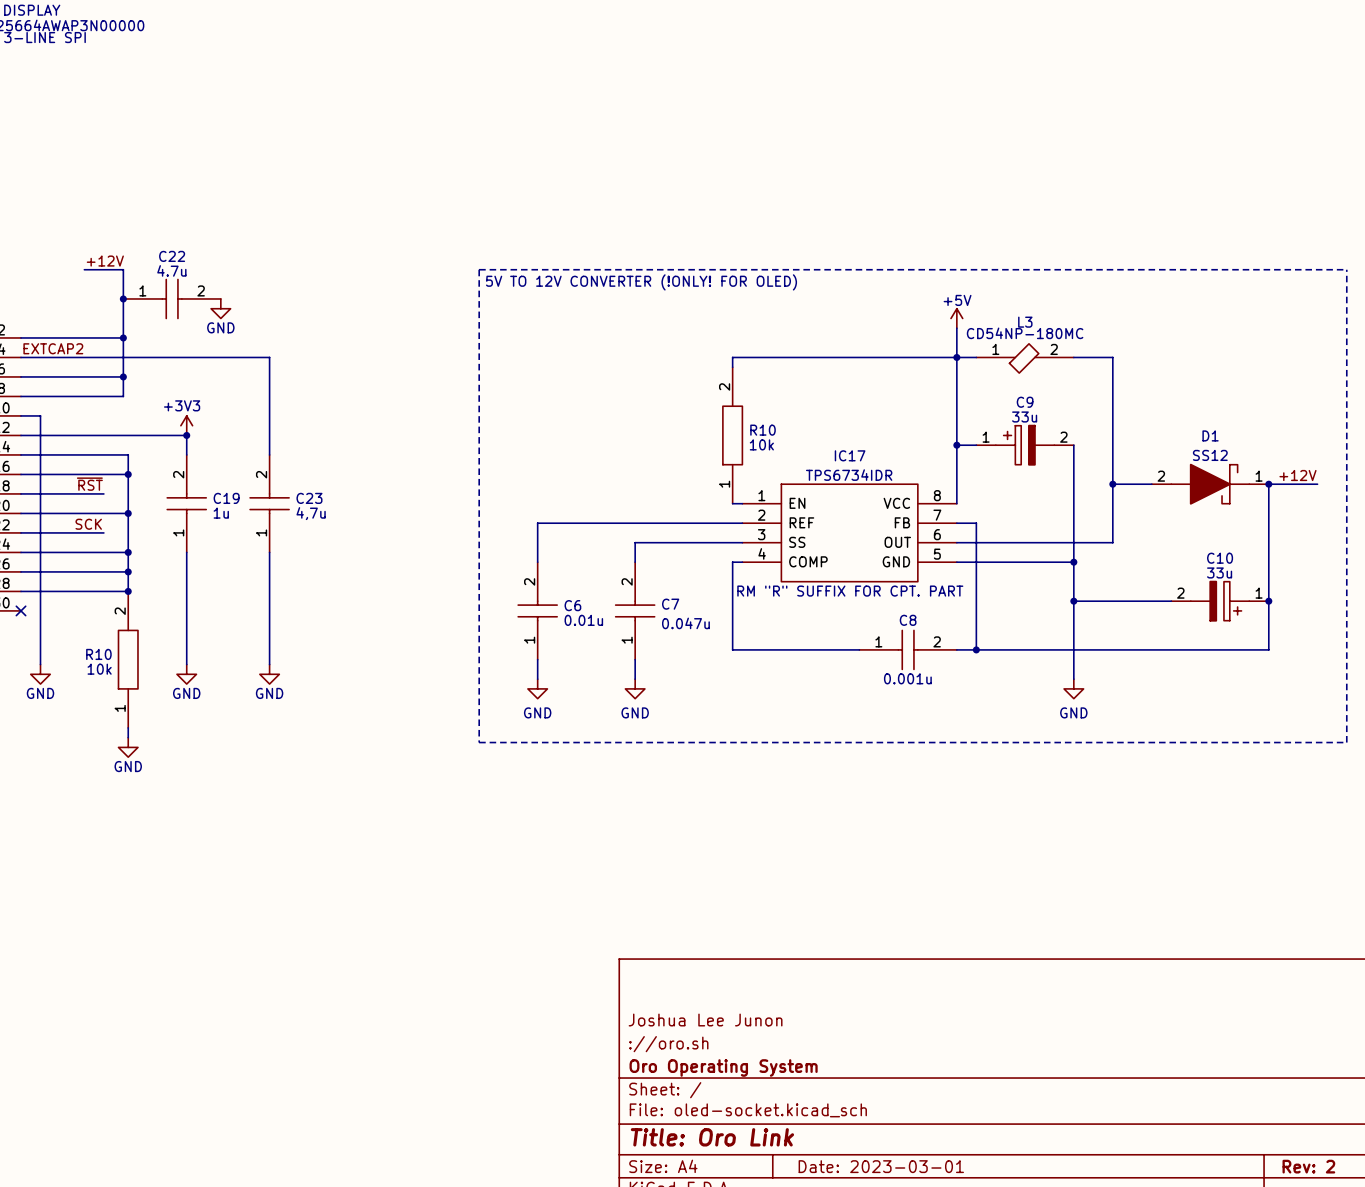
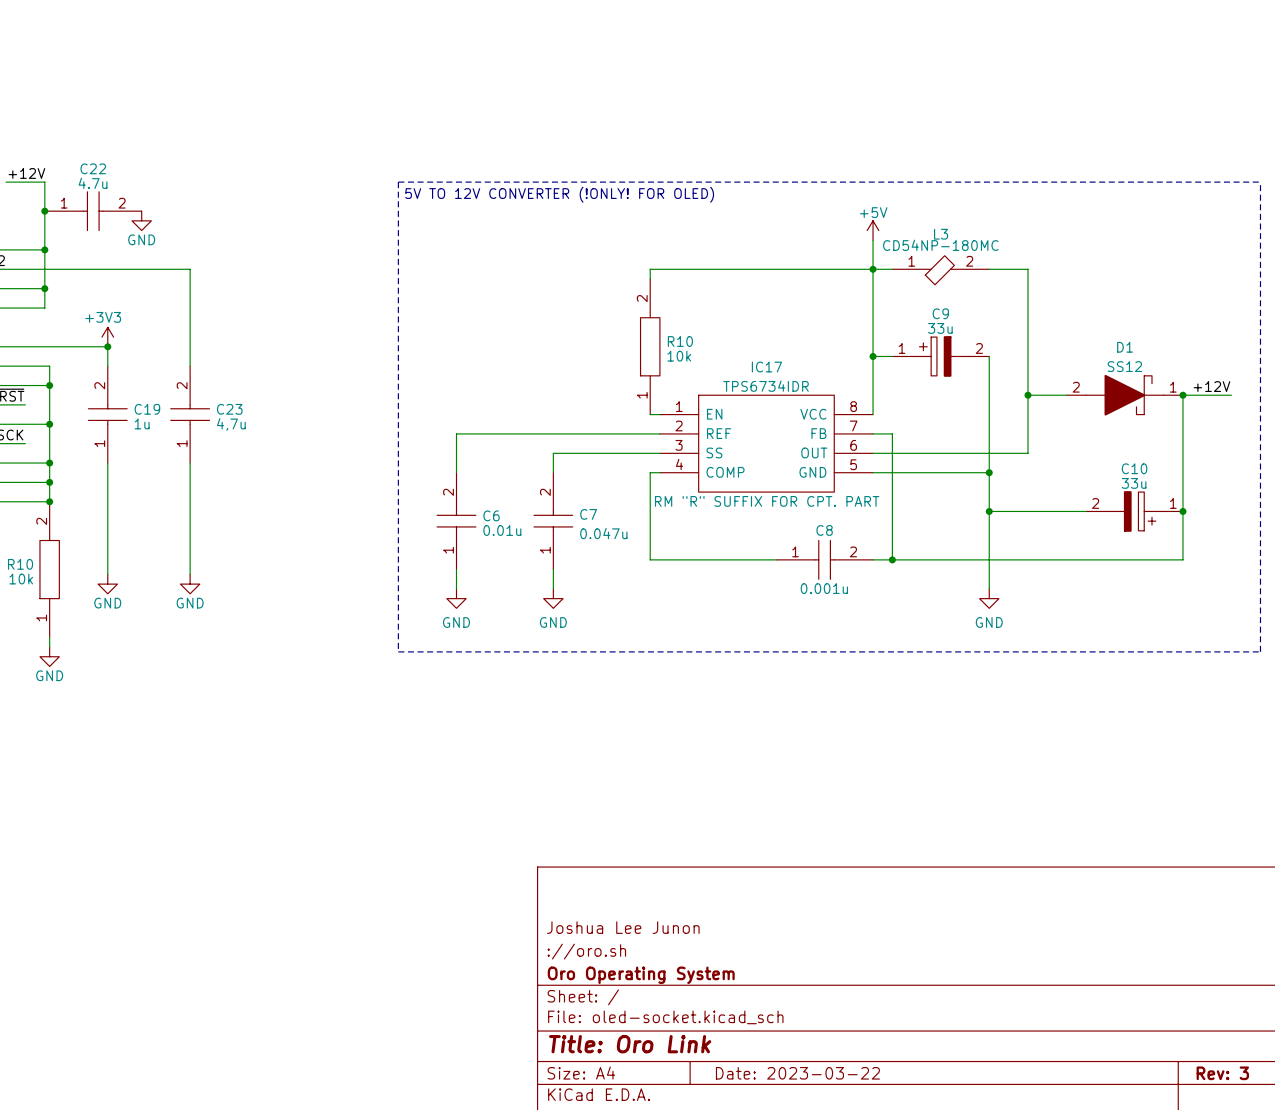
title block: Date: 2023-03-01 (881, 1166) -> Date: 2023-03-22 (797, 1073)
title block: Rev: 2 (1308, 1166) -> Rev: 3 (1222, 1073)

